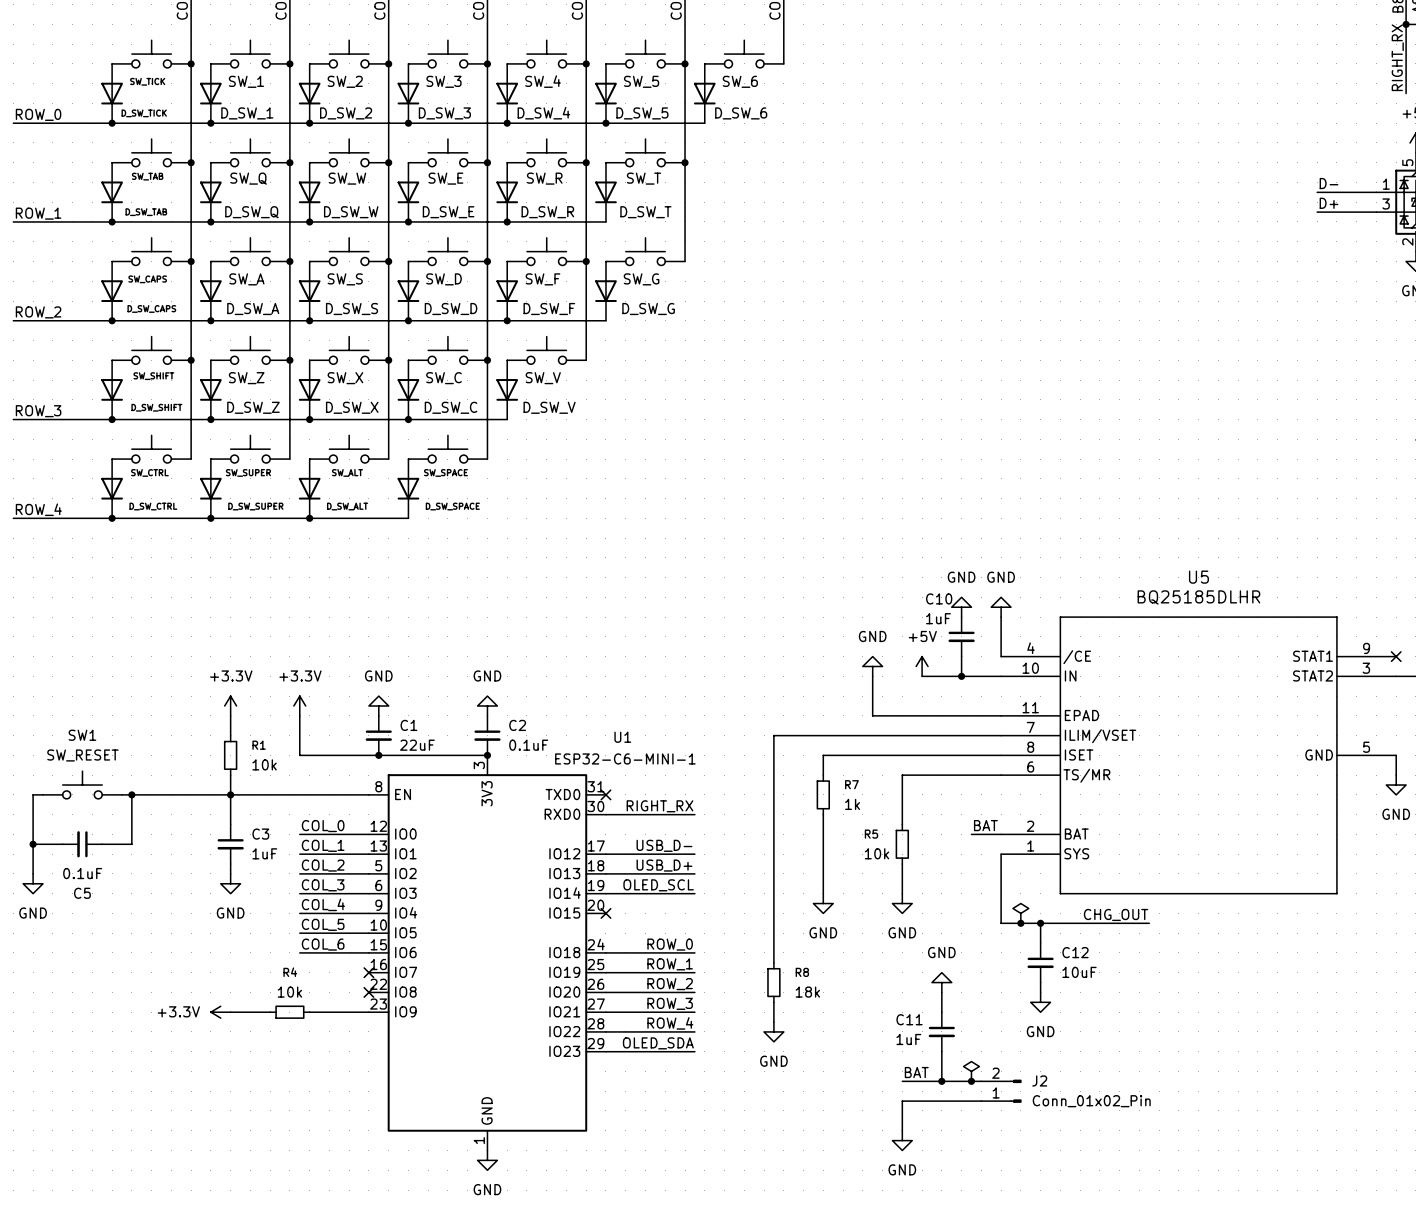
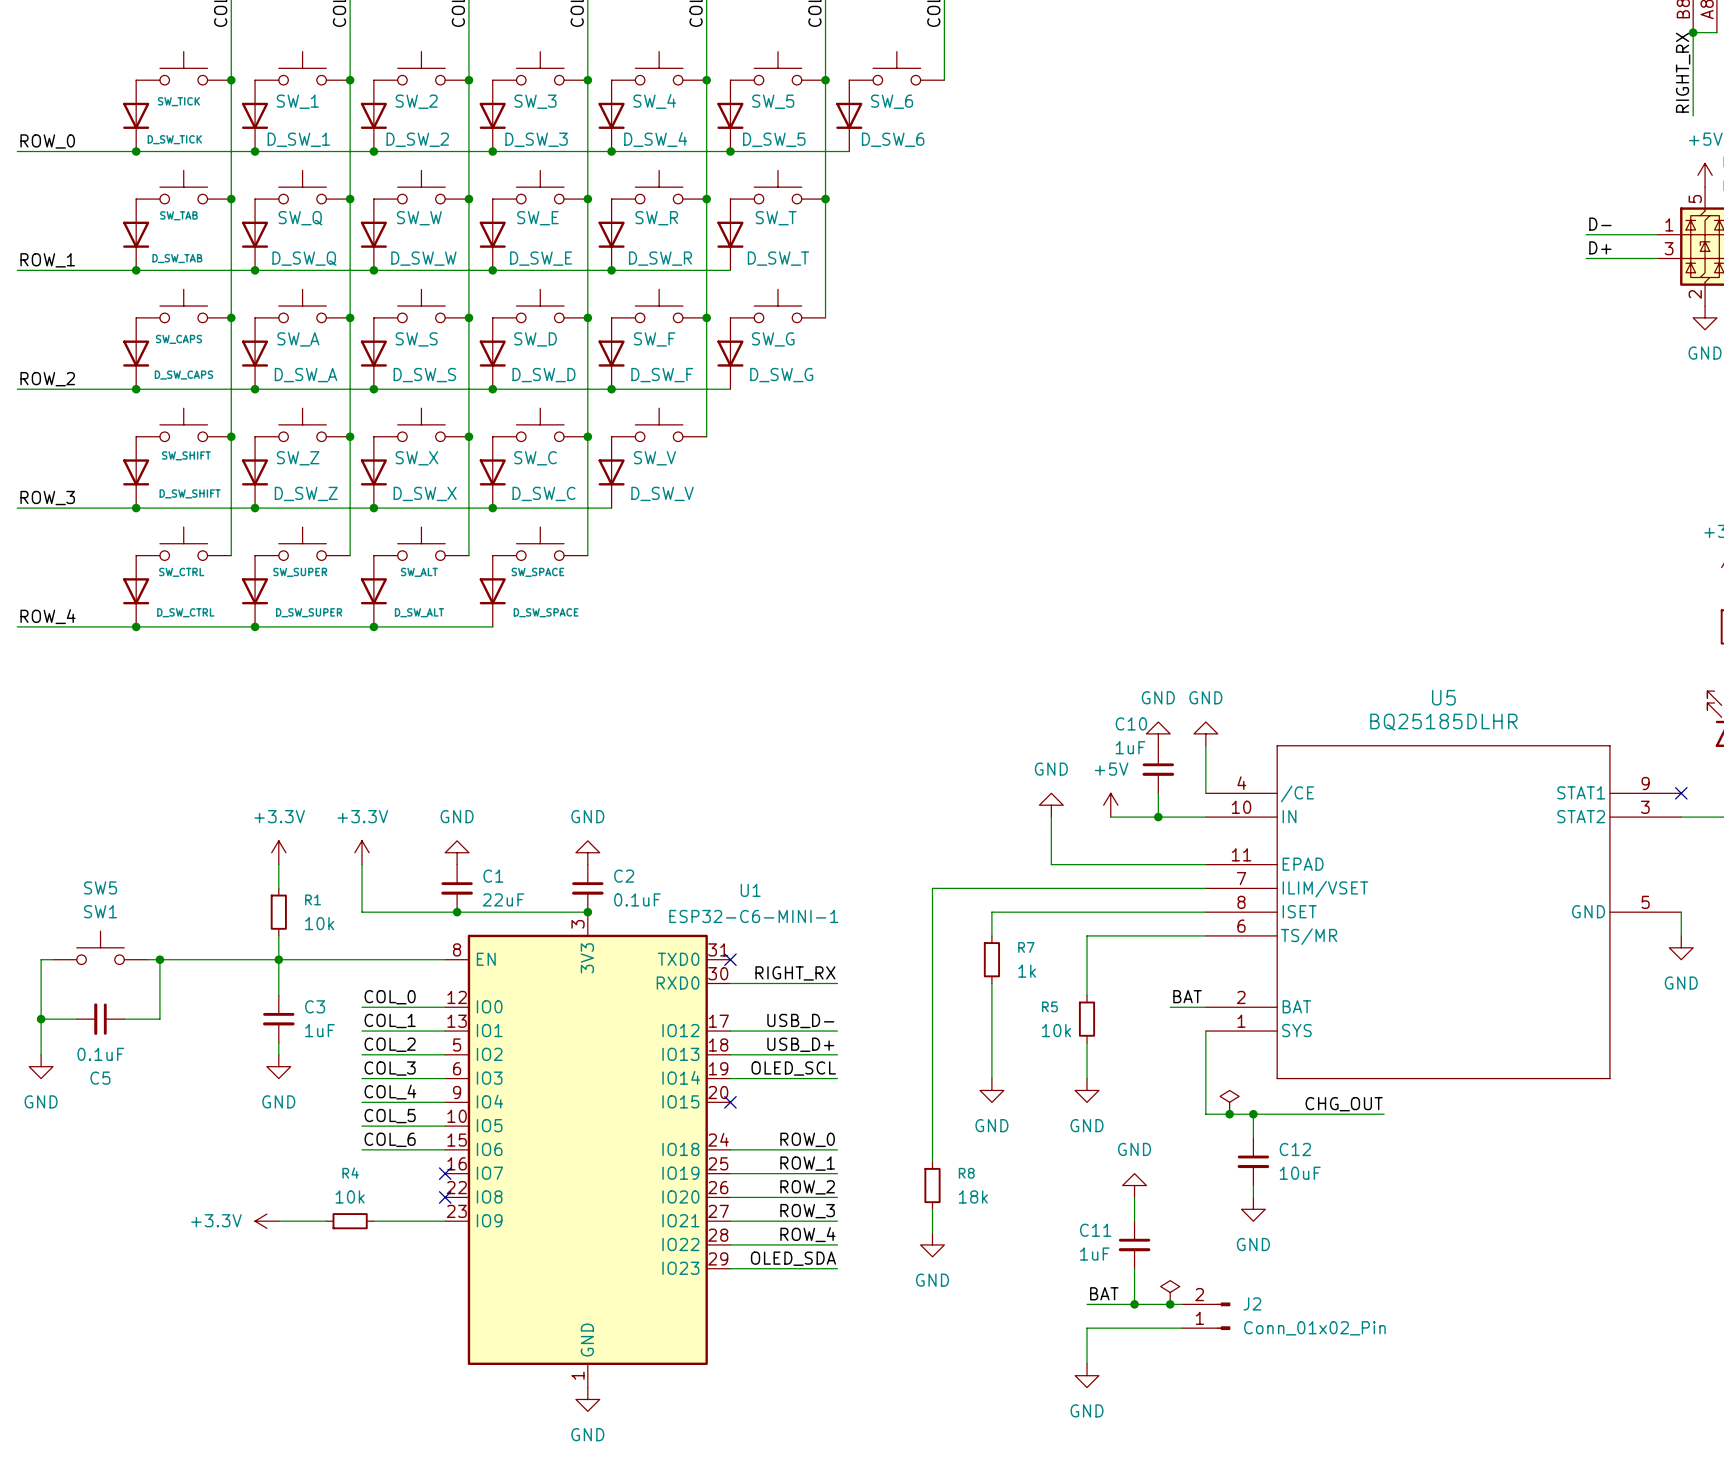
SW1 name position: SW1 (82, 735) -> SW1 (100, 911)
SW1 value: SW_RESET (82, 755) -> SW5 (100, 887)

